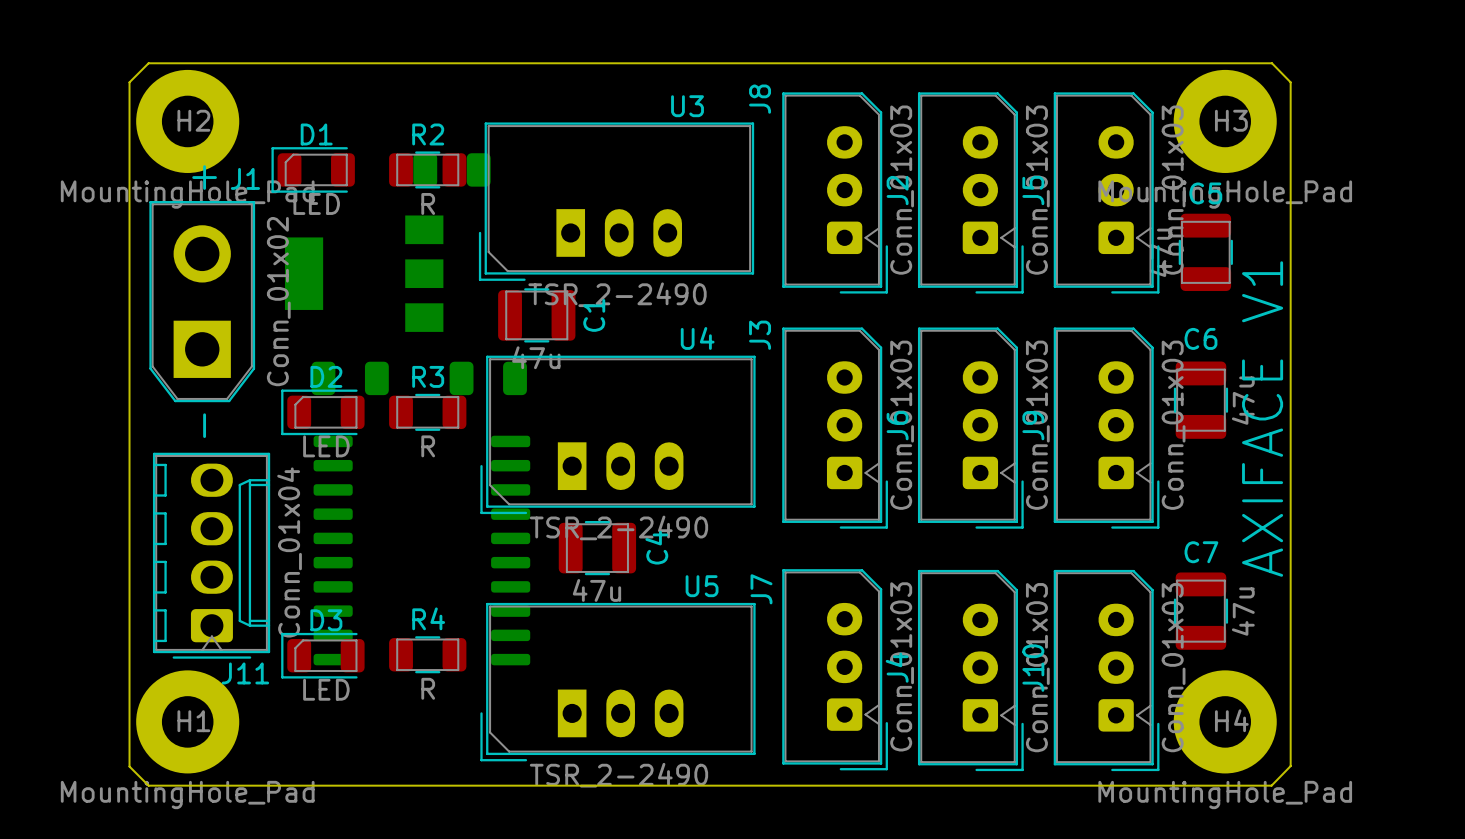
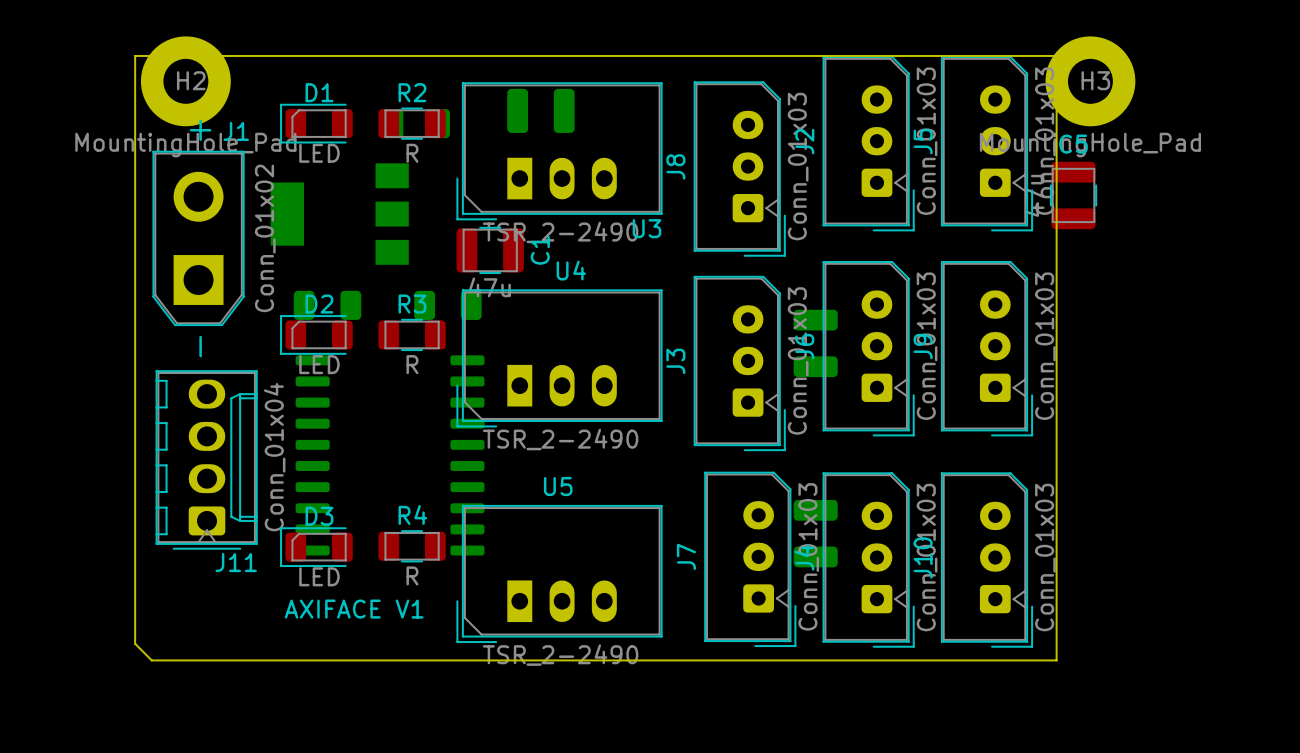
board edge: (129, 92) (129, 82) (148, 63) (1271, 63) (1290, 82) (1290, 766) (1271, 785) (1186, 785) -> (135, 55) (1056, 55) (1056, 660)
J8 name position: J8 (760, 99) -> J8 (675, 166)
U3 name position: U3 (687, 106) -> U3 (647, 228)
U3 footprint: [478, 122, 755, 281] -> [456, 82, 663, 221]
D1 position: (313, 169) -> (316, 123)
R2 position: (427, 169) -> (412, 123)
J8 position: (835, 192) -> (739, 169)
J3 name position: J3 (760, 335) -> J3 (675, 361)
U4 name position: U4 (697, 338) -> U4 (571, 270)
U4 footprint: [480, 355, 756, 515] -> [456, 289, 663, 428]
C6 side: top (1200, 400) -> bottom (815, 343)
D2 position: (322, 412) -> (316, 334)
R3 position: (427, 412) -> (412, 334)
text: AXIFACE V1 (1262, 419) -> none
J3 position: (835, 428) -> (739, 363)
C4 side: top (597, 548) -> bottom (540, 110)
U5 name position: U5 (702, 586) -> U5 (558, 486)
J7 name position: J7 (761, 589) -> J7 (686, 556)
U5 footprint: [480, 602, 756, 762] -> [456, 504, 663, 644]
C7 side: top (1200, 611) -> bottom (815, 533)
R4 position: (427, 654) -> (412, 546)
D3 position: (322, 655) -> (316, 547)
H1: MountingHole_Pad (187, 721) -> none
H4: MountingHole_Pad (1225, 721) -> none
text: none -> AXIFACE V1 (354, 609)

